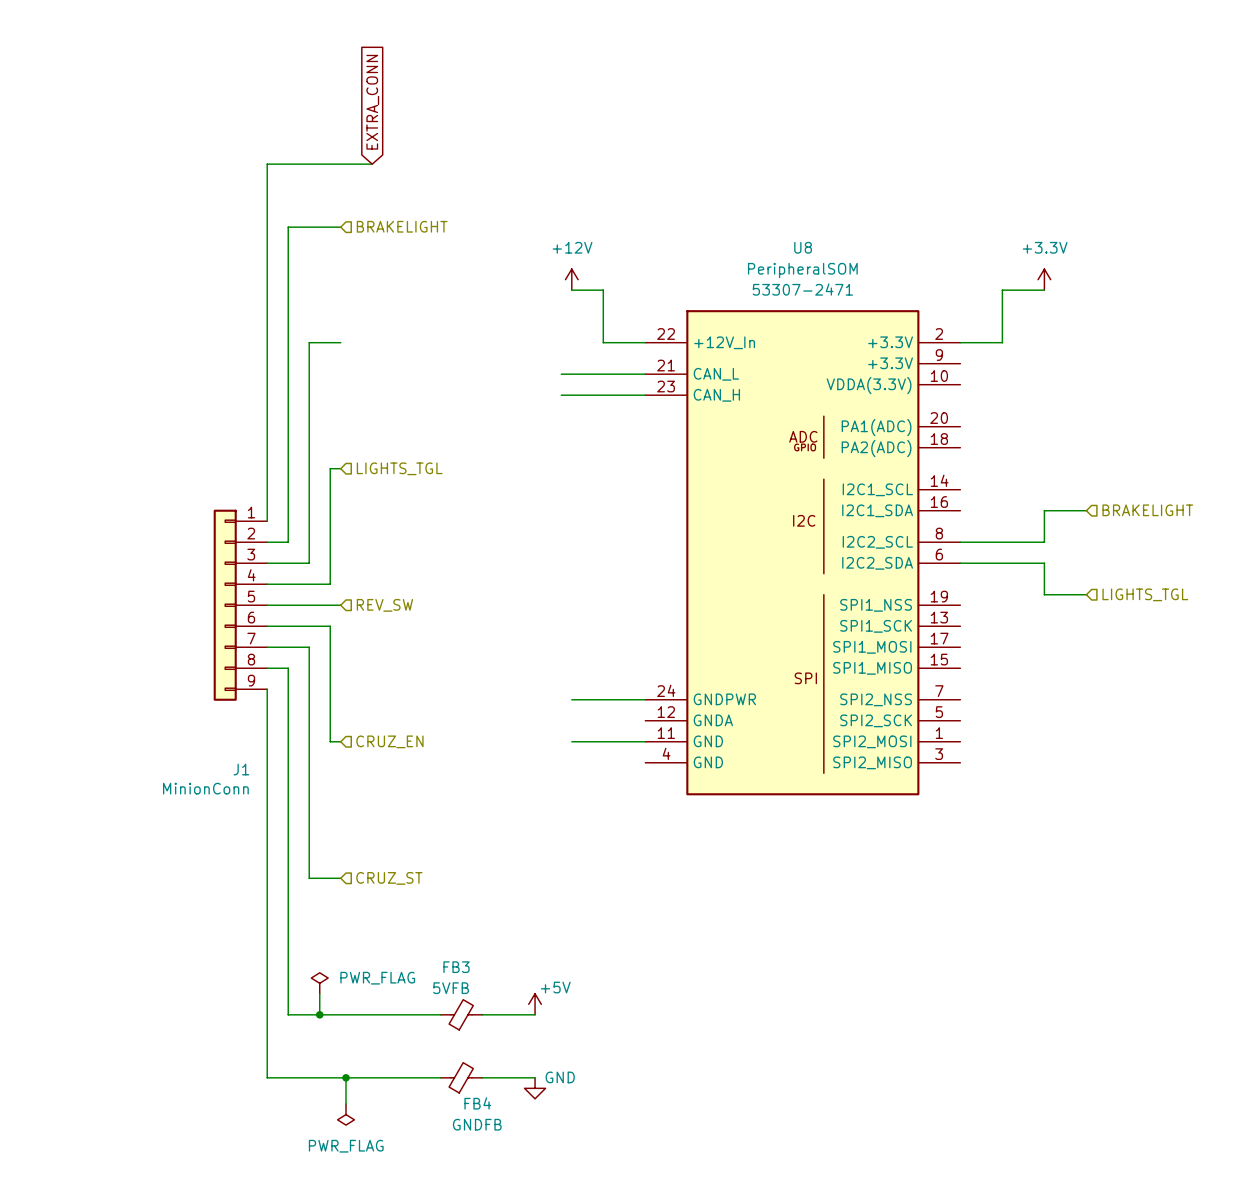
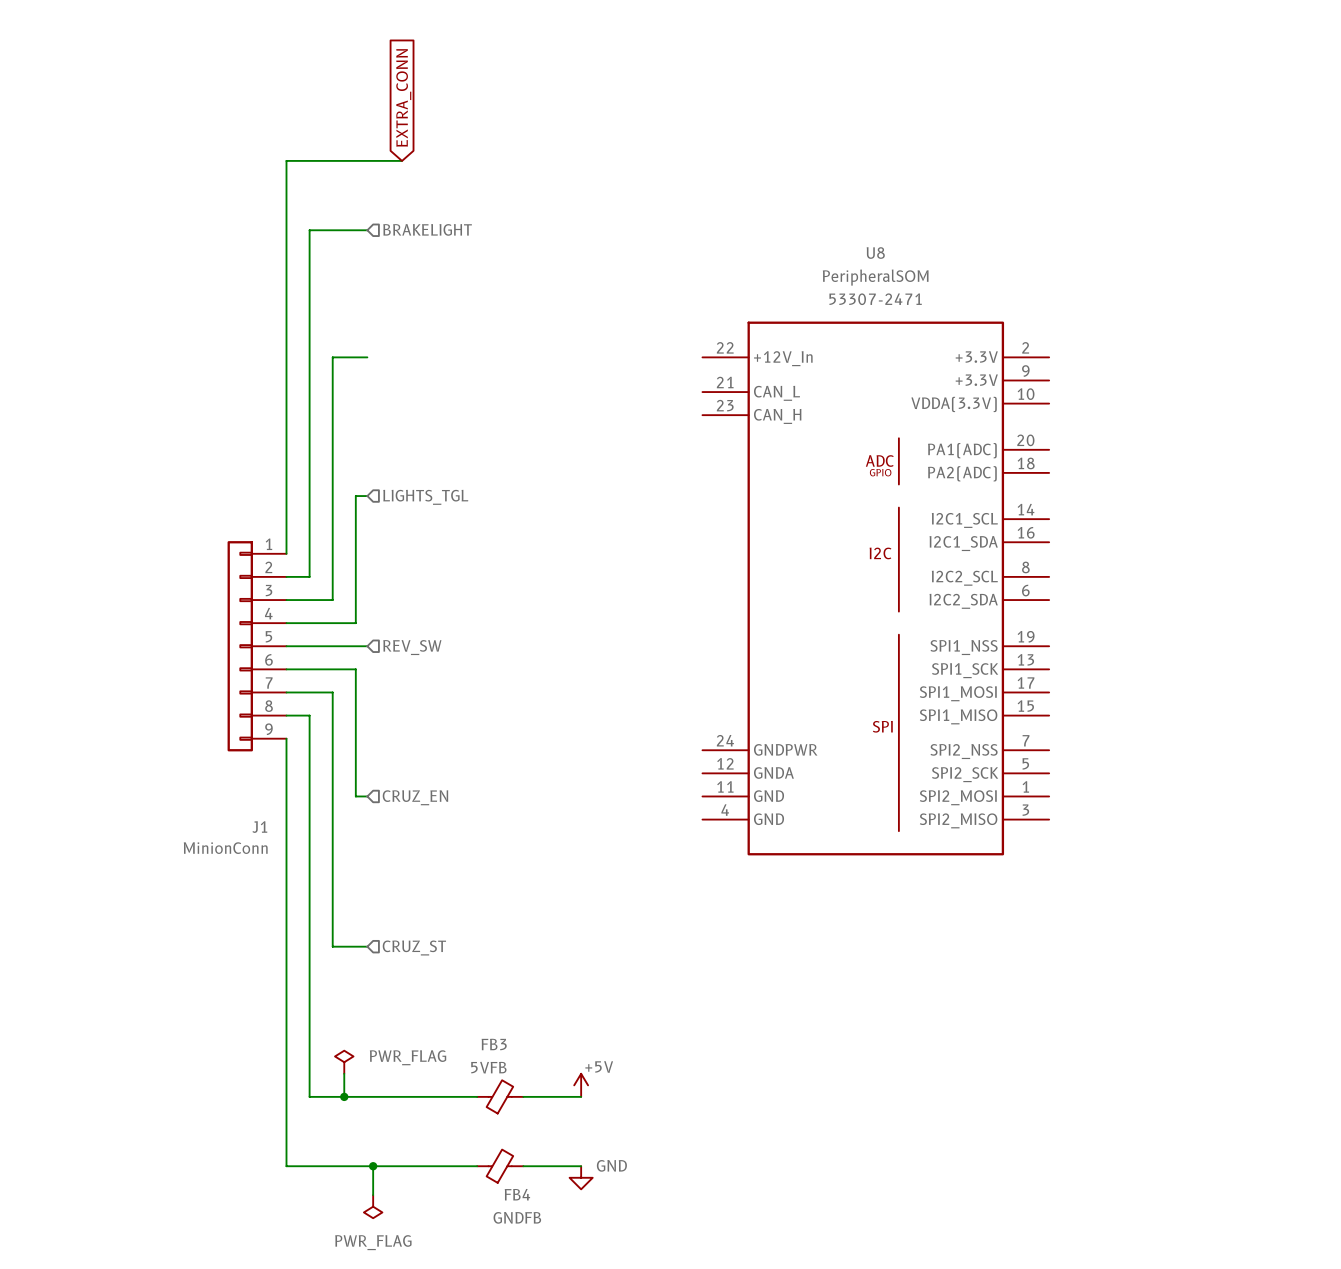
power symbol: +12V (571, 279) -> none
power symbol: +3.3V (1044, 279) -> none
wire: (571, 290) (603, 290) (603, 342) (645, 342) -> none
wire: (1044, 290) (1002, 290) (1002, 342) (960, 342) -> none
wire: (561, 374) (645, 374) -> none
wire: (561, 395) (645, 395) -> none
wire: (1086, 510) (1044, 510) (1044, 542) (960, 542) -> none
hierarchical label: BRAKELIGHT (1147, 510) -> none
wire: (960, 563) (1044, 563) (1044, 594) (1086, 594) -> none
hierarchical label: LIGHTS_TGL (1145, 594) -> none
wire: (571, 699) (645, 699) -> none
wire: (571, 741) (645, 741) -> none

